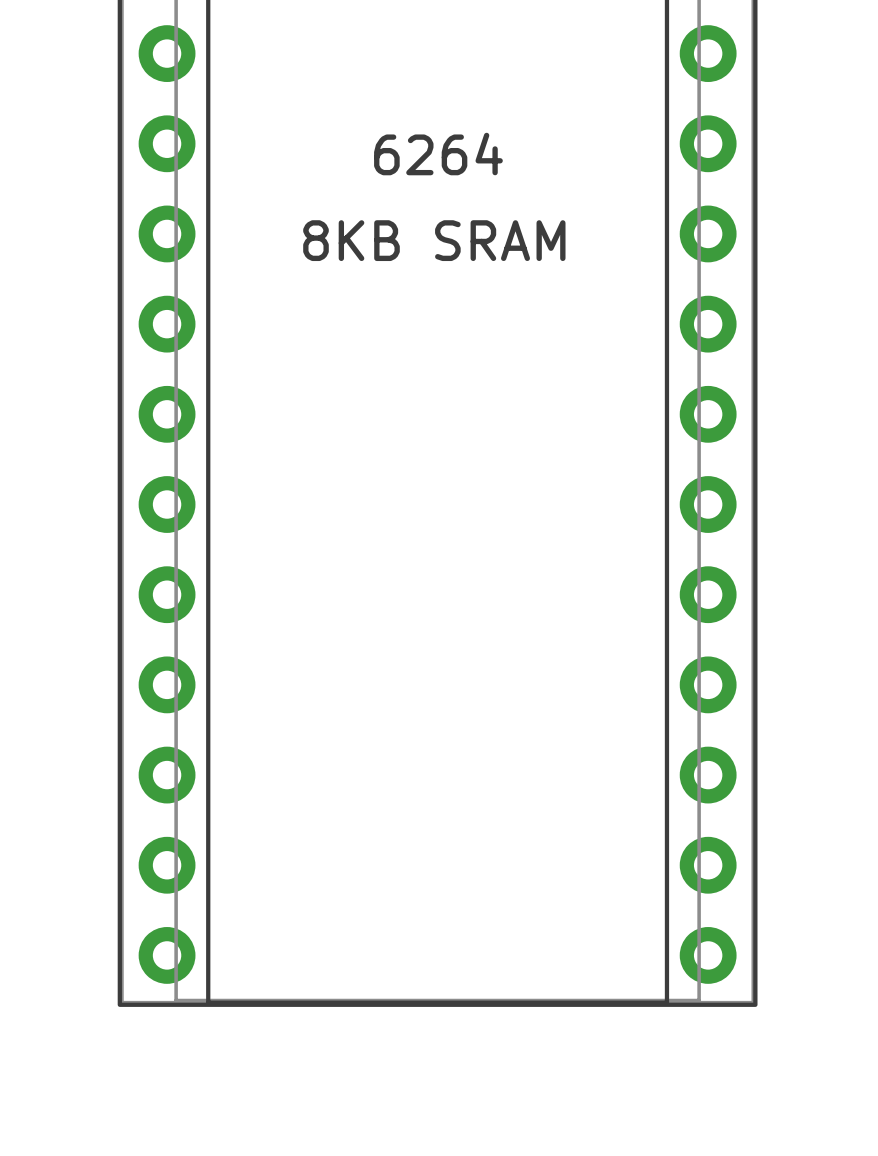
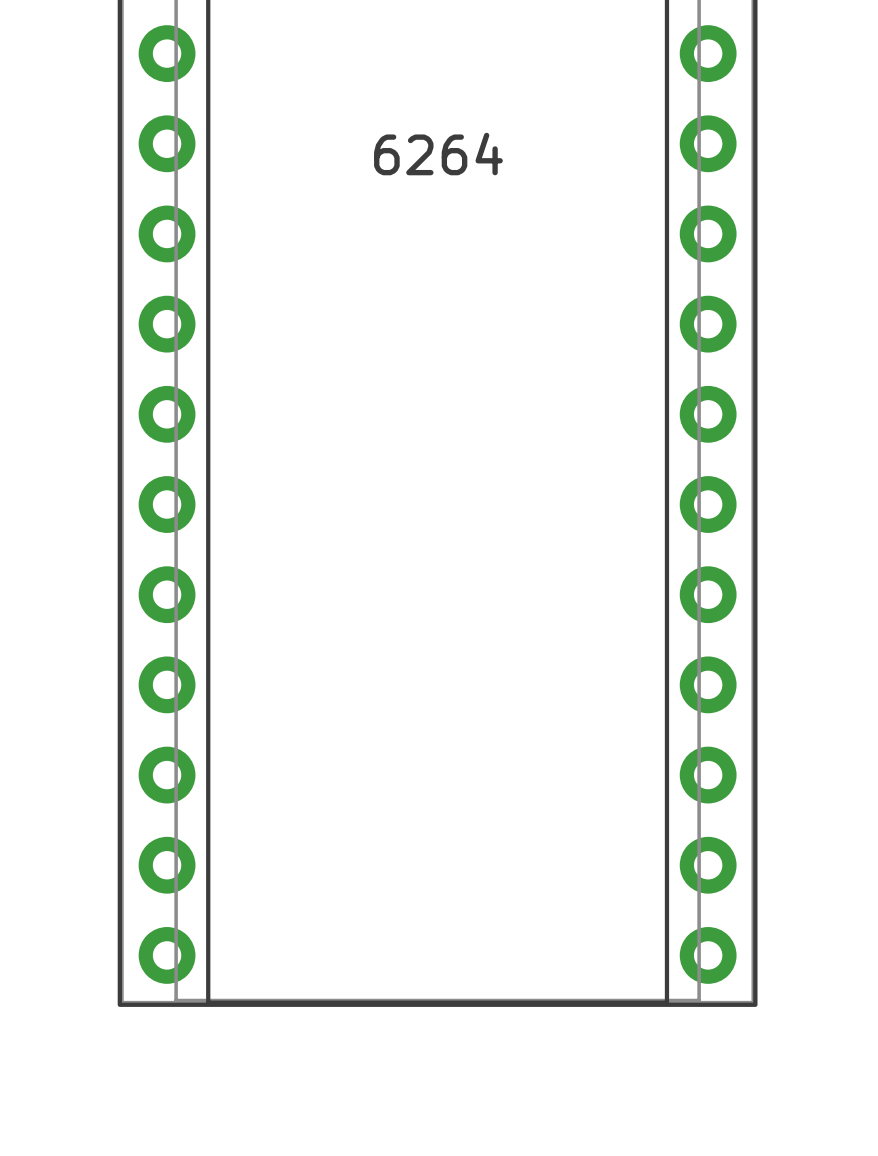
text: 8KB SRAM (434, 240) -> none

